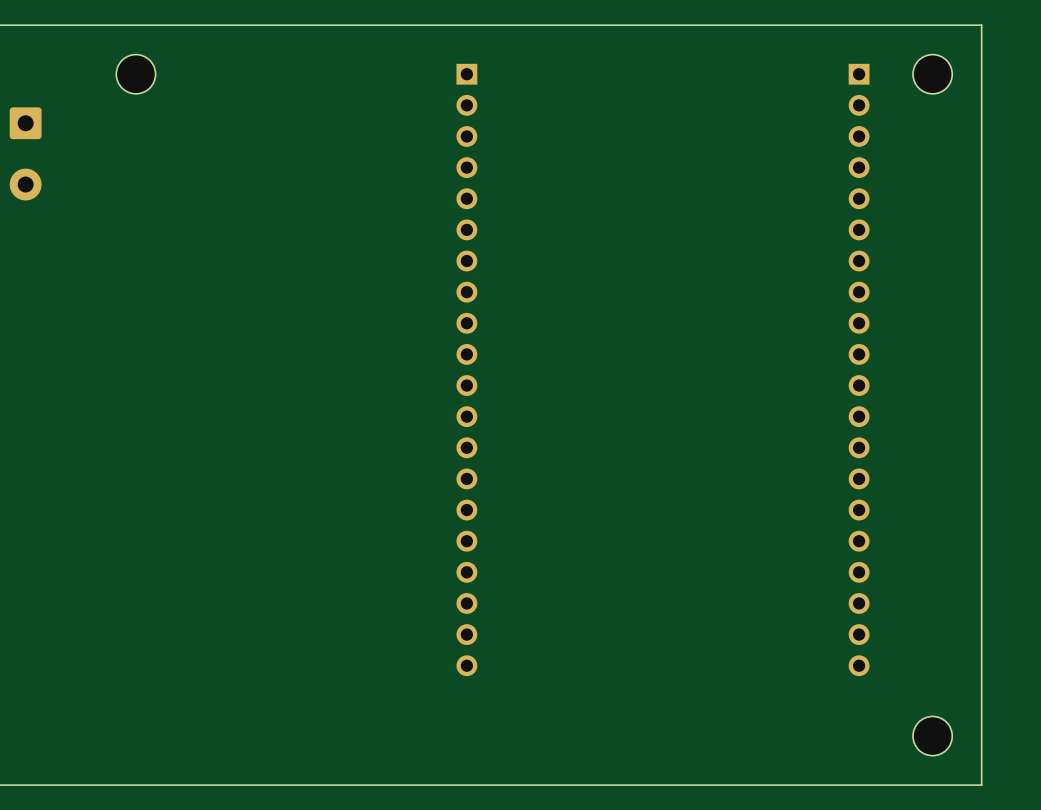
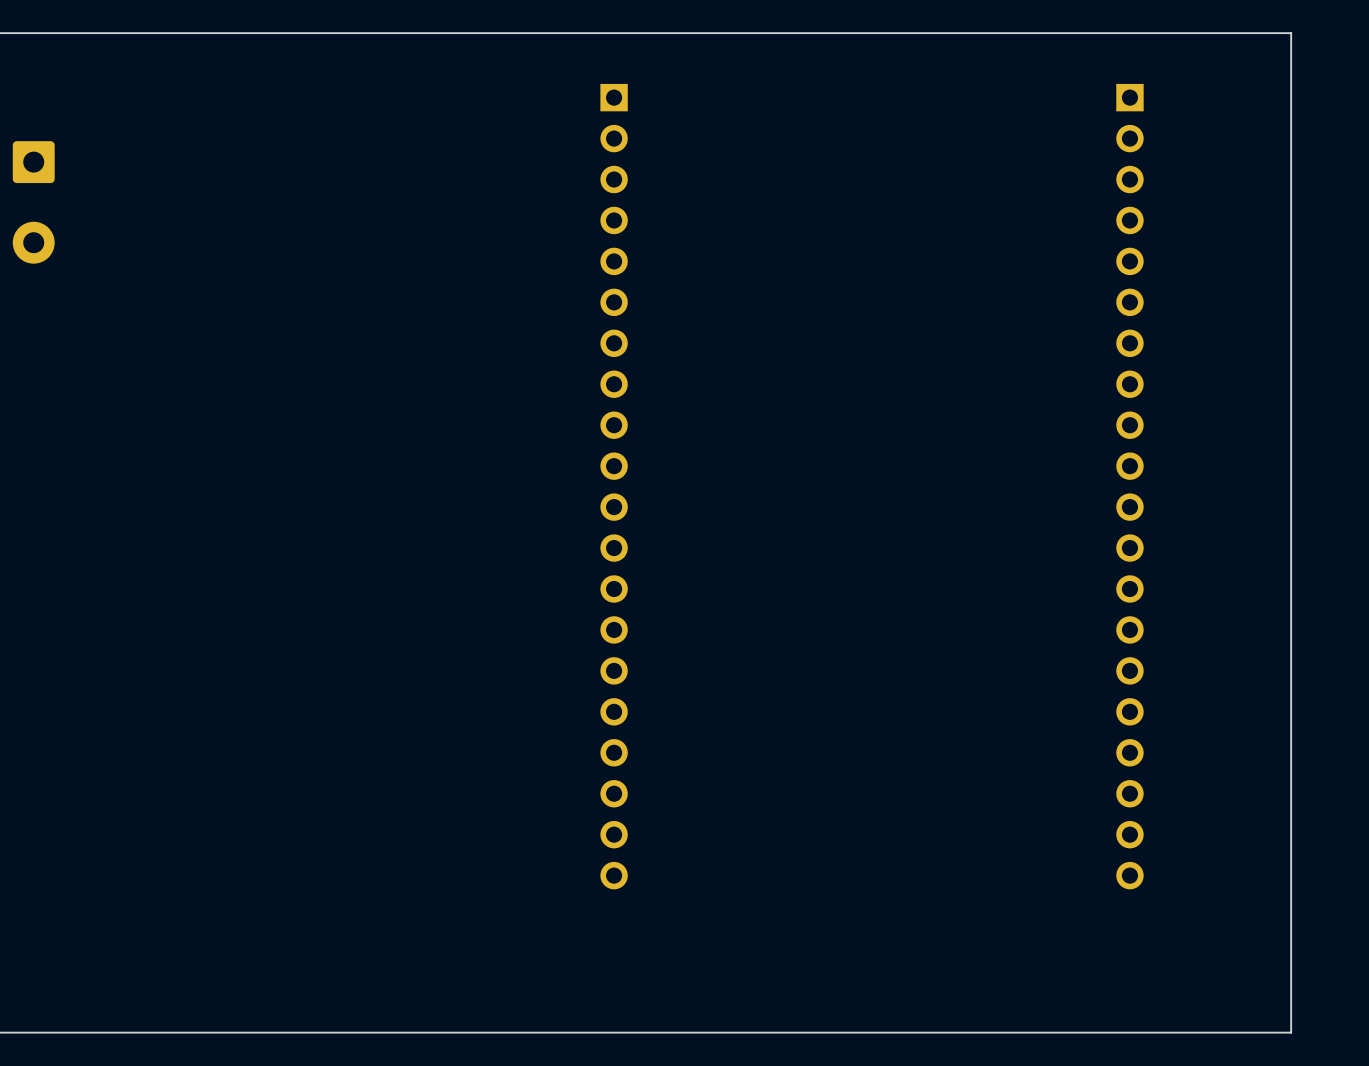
part: (135, 74) -> none
part: (932, 74) -> none
part: (932, 736) -> none

